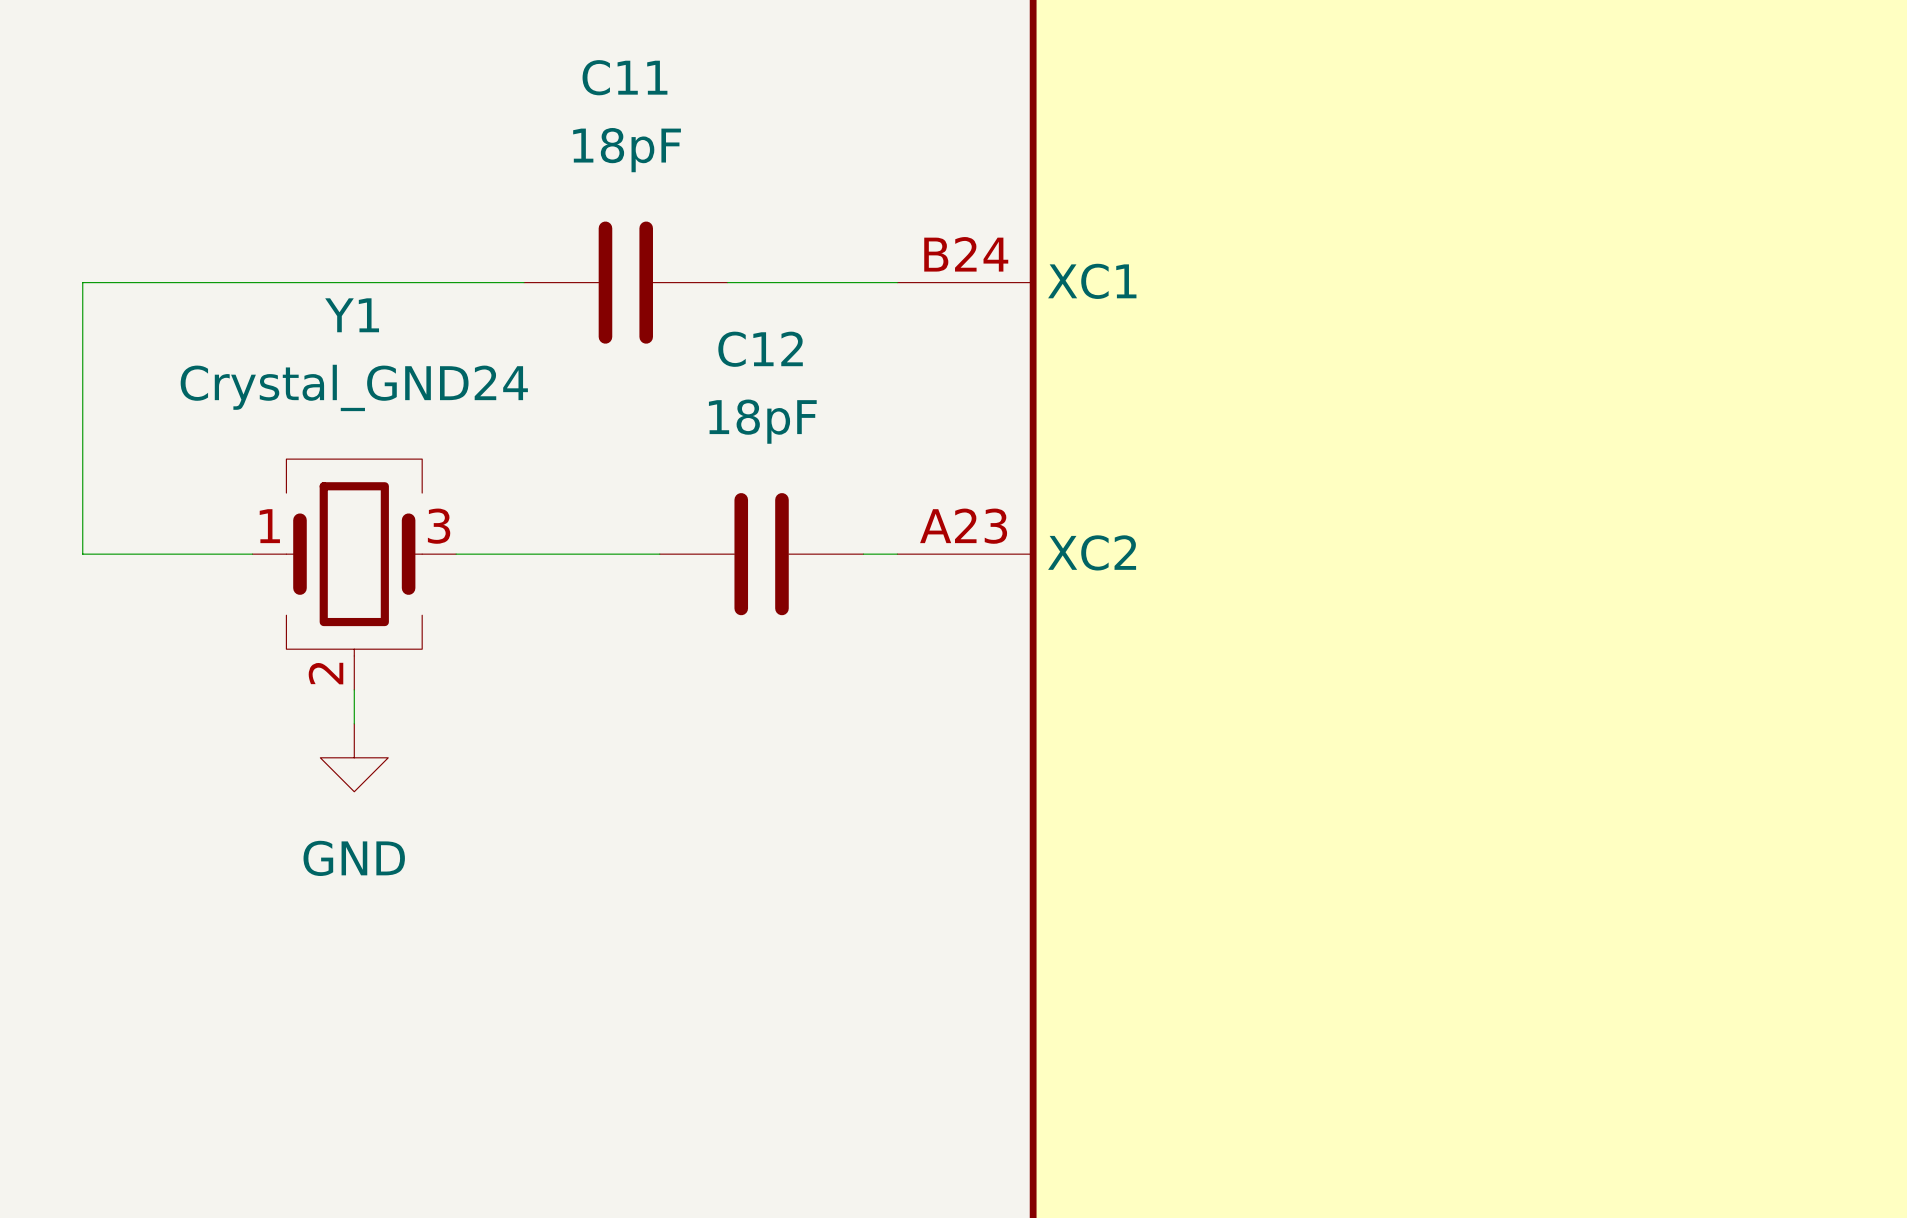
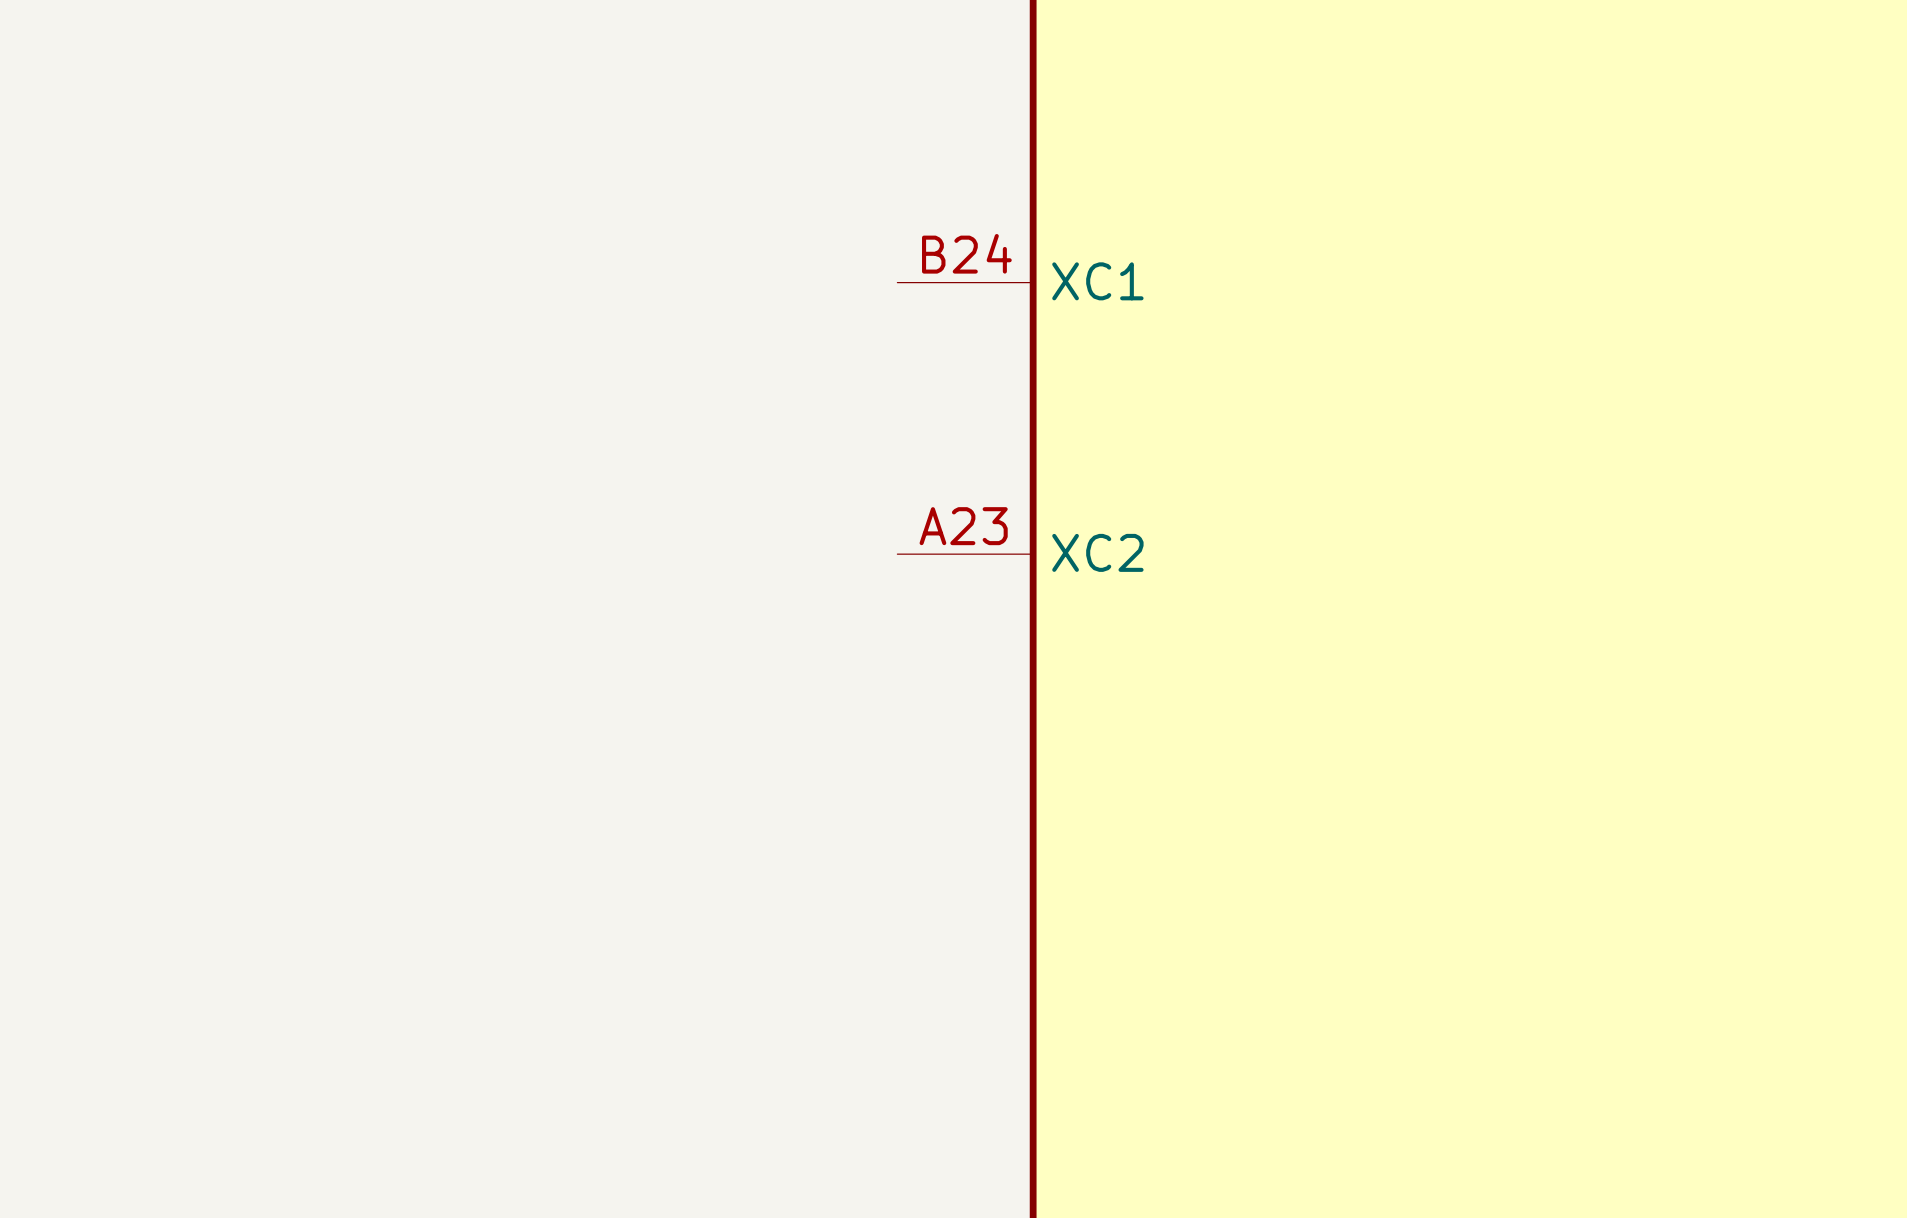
wire: (524, 282) (82, 282) (82, 554) (252, 554) -> none
C11: 18pF (625, 282) -> none
wire: (727, 282) (897, 282) -> none
wire: (456, 554) (659, 554) -> none
C12: 18pF (761, 554) -> none
wire: (863, 554) (897, 554) -> none
Y1: Crystal_GND24 (354, 574) -> none
wire: (354, 689) (354, 723) -> none
power symbol: GND (354, 757) -> none

